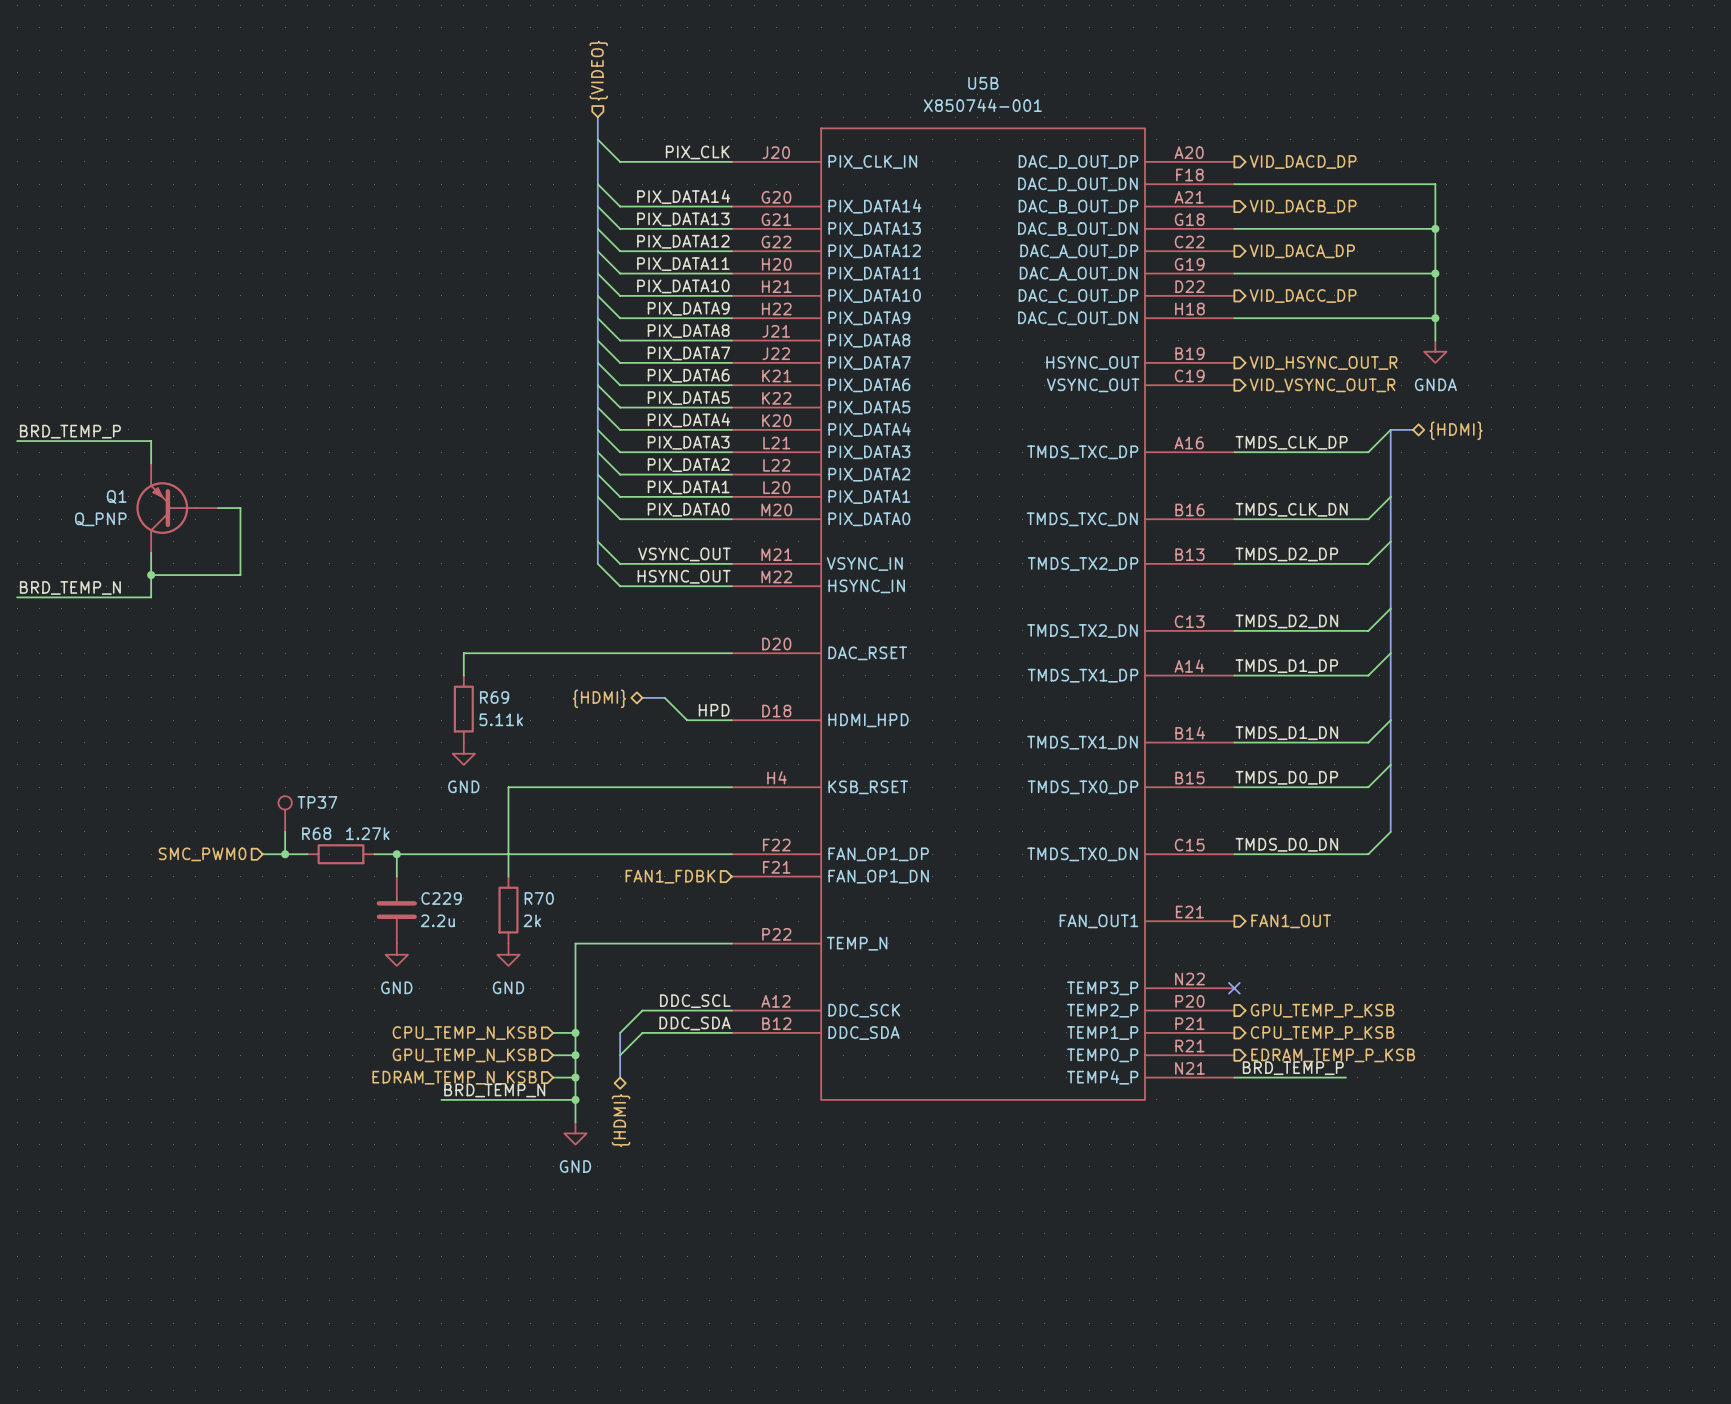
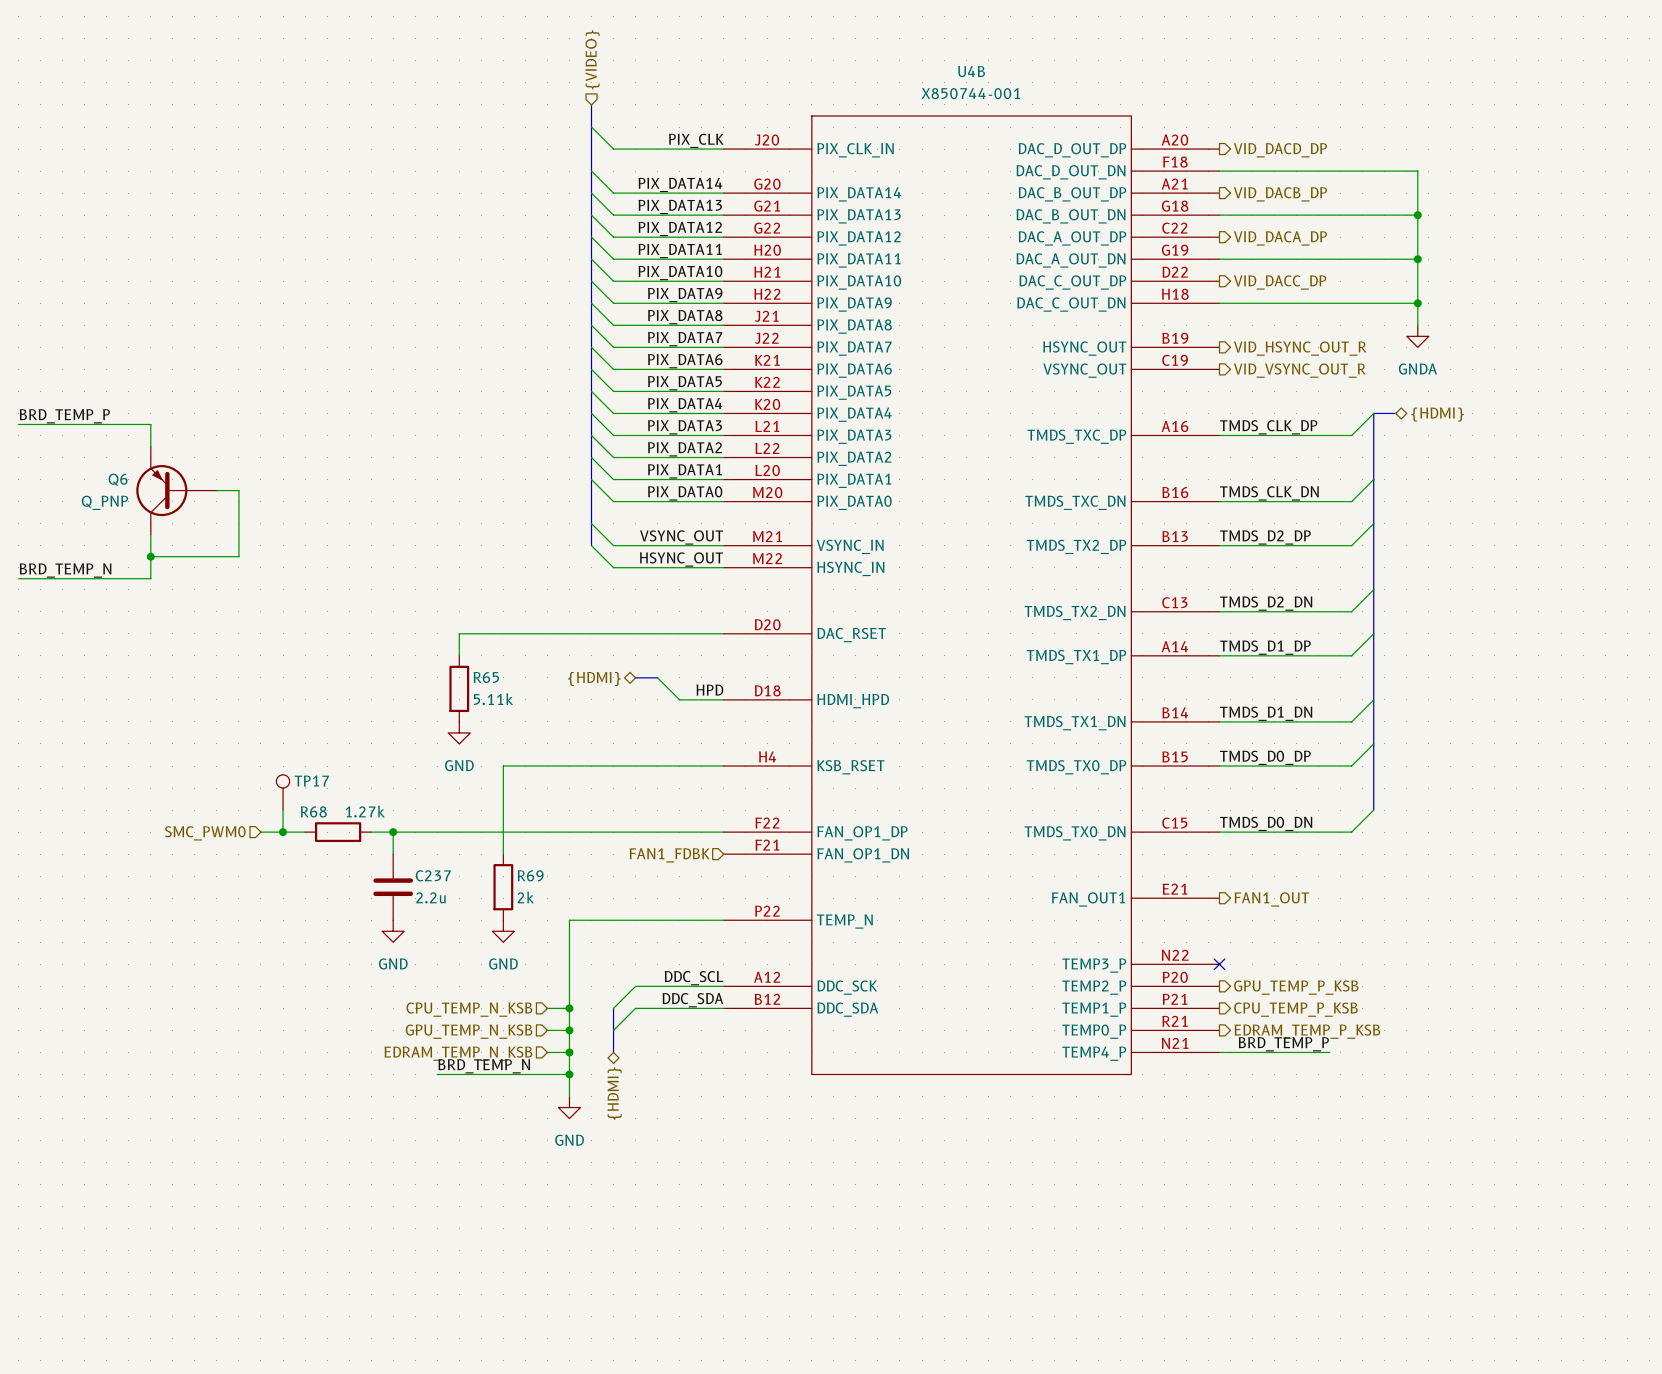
U5B name: U5B (983, 83) -> U4B (971, 71)
Q1 name: Q1 (116, 497) -> Q6 (118, 479)
R69 name: R69 (494, 697) -> R65 (486, 677)
TP37 name: TP37 (317, 802) -> TP17 (311, 781)
C229 name: C229 (441, 898) -> C237 (433, 875)
R70 name: R70 (539, 898) -> R69 (530, 875)

